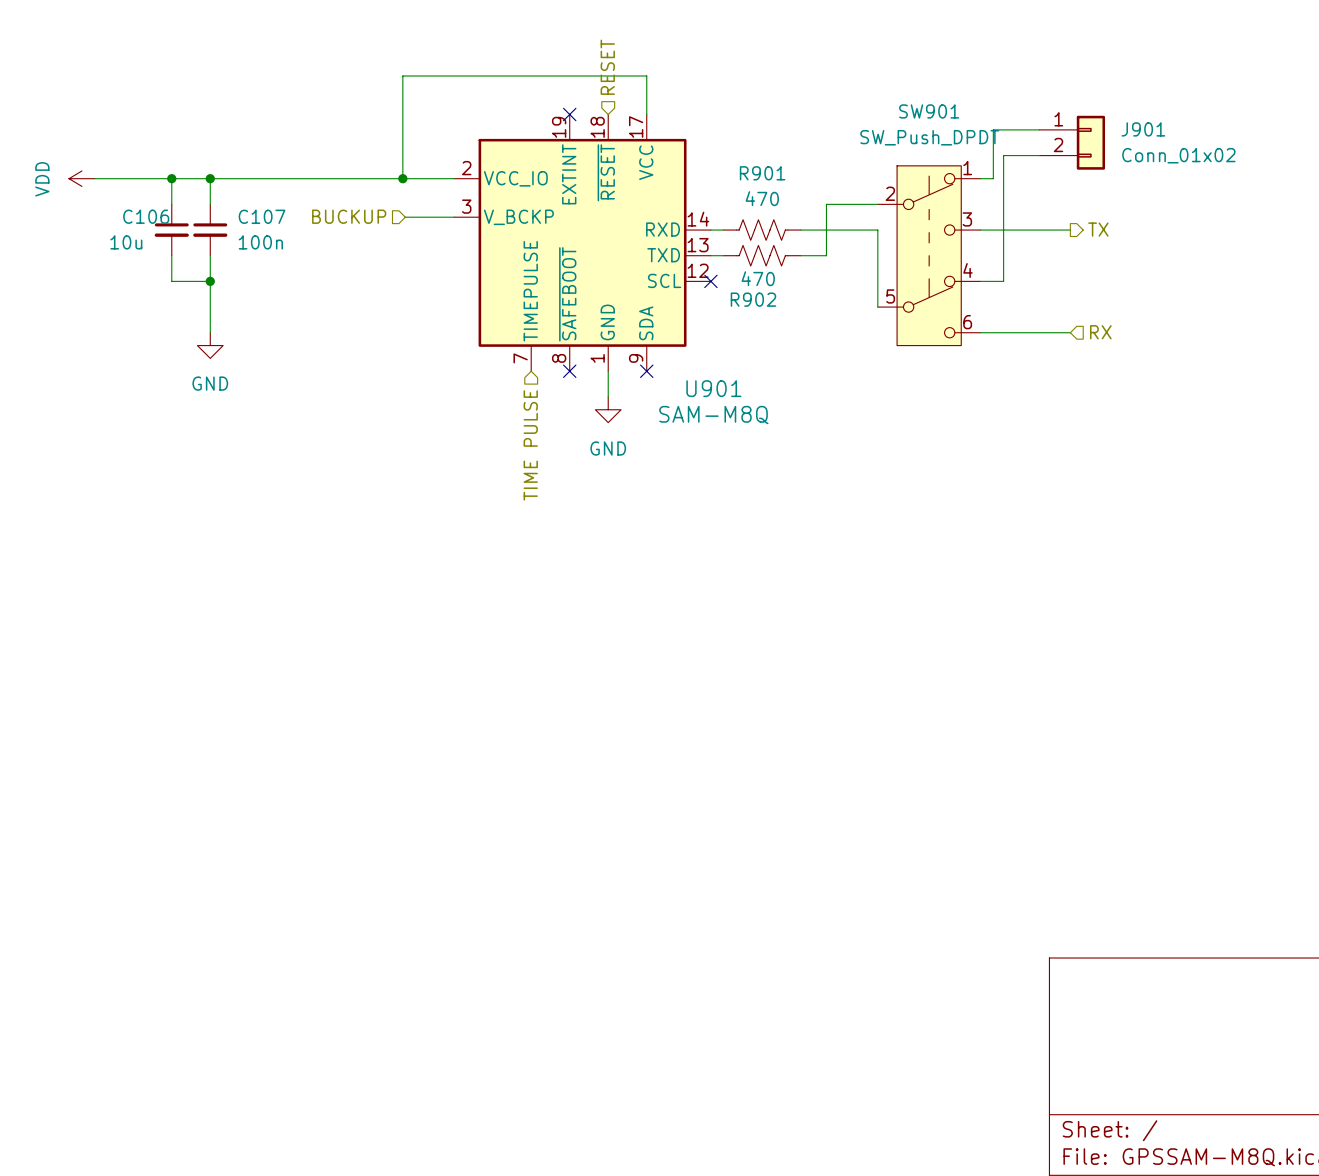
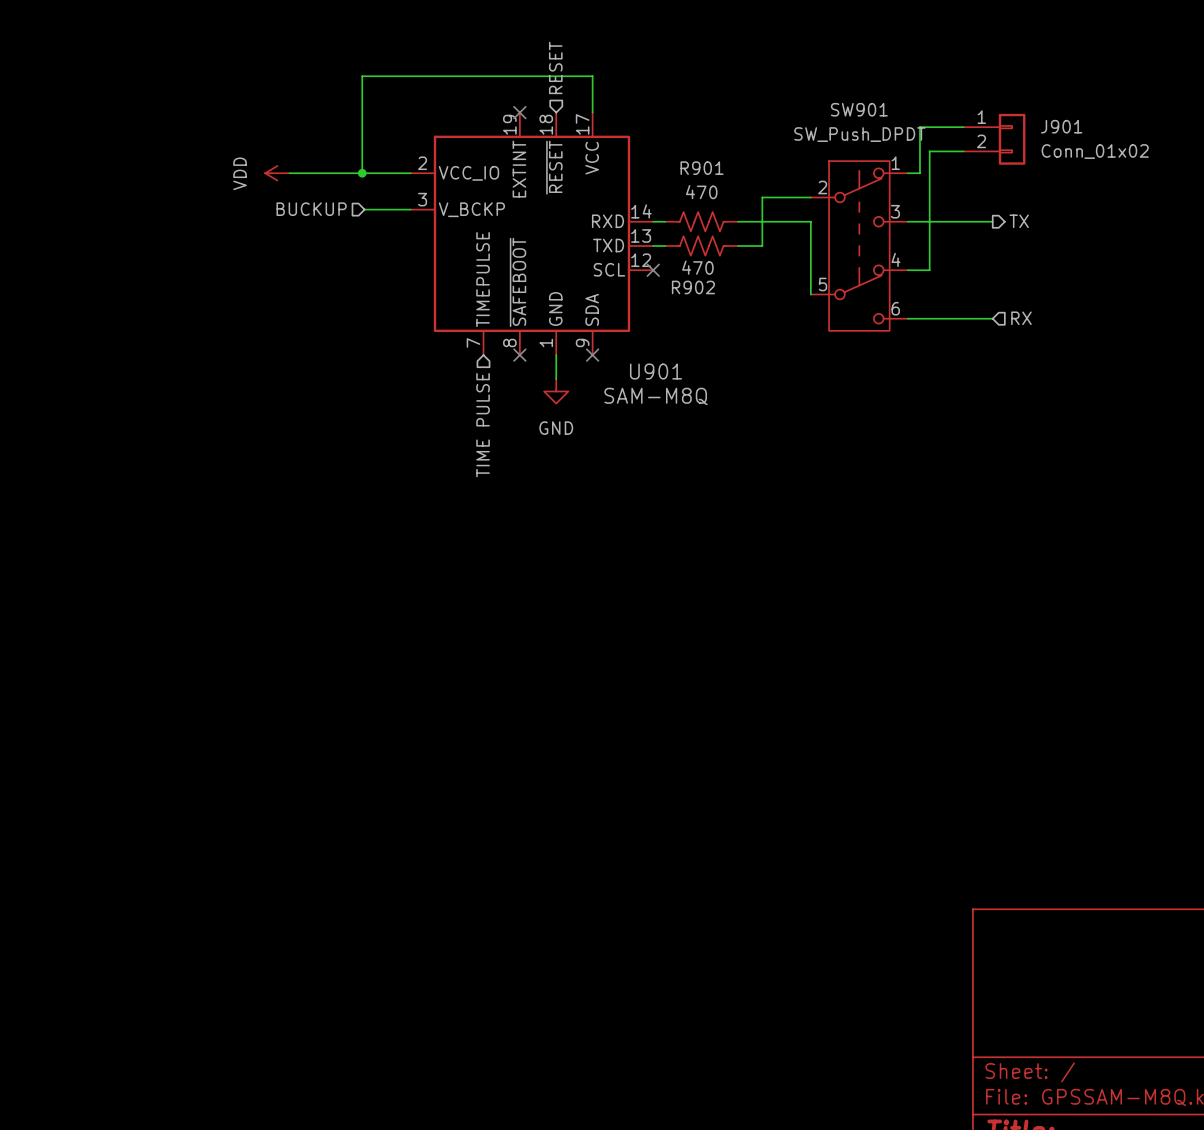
power symbol position: VDD (81, 178) -> VDD (277, 173)
wire: (94, 178) (325, 178) -> none
wire: (171, 178) (171, 204) -> none
junction: (171, 178) -> none
wire: (210, 178) (210, 204) -> none
junction: (210, 178) -> none
C106: 10u (171, 230) -> none
C107: 100n (210, 230) -> none
wire: (171, 255) (171, 281) (210, 281) -> none
wire: (210, 255) (210, 332) -> none
junction: (210, 281) -> none
power symbol: GND (210, 345) -> none

